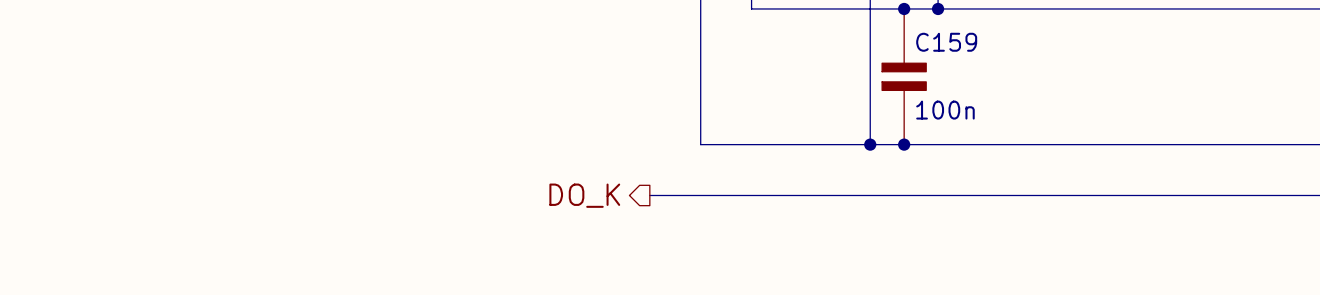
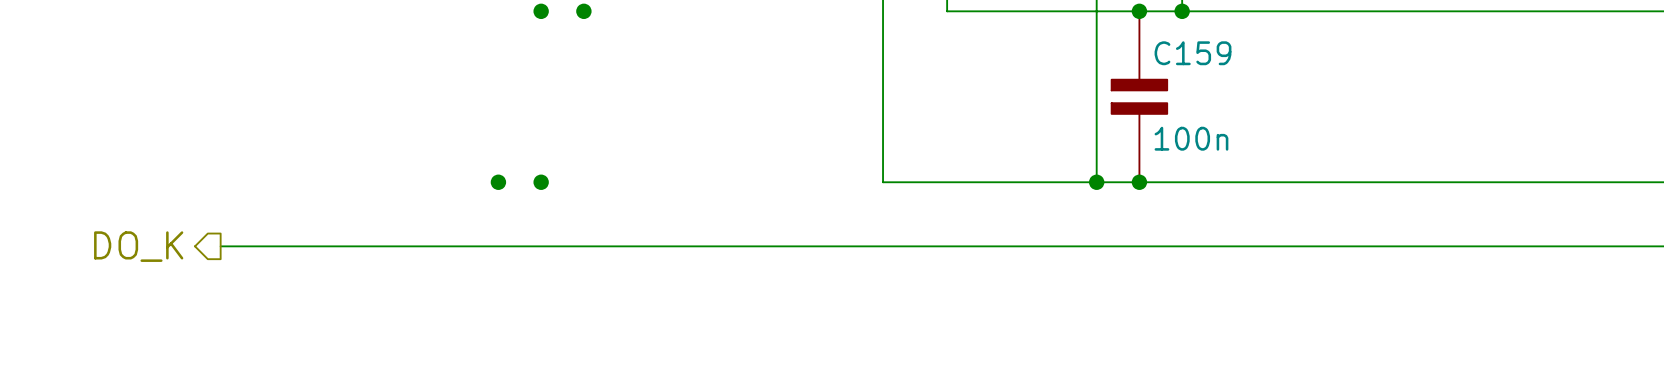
junction: none -> (541, 11)
junction: none -> (583, 11)
junction: none -> (498, 182)
junction: none -> (541, 182)
hierarchical label: none -> DO_K (138, 246)
wire: none -> (220, 246) (818, 246)
hierarchical label: DO_K (584, 195) -> none

